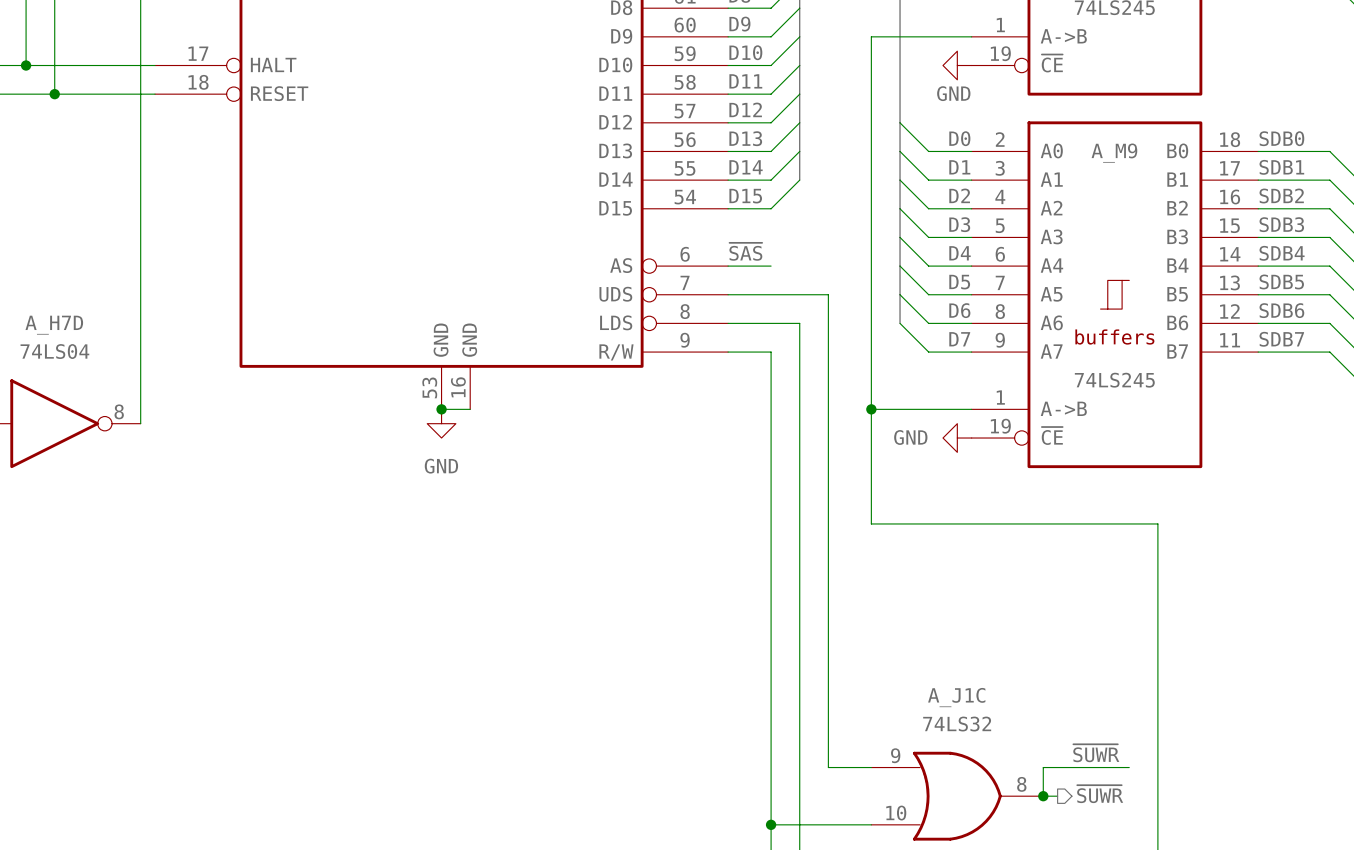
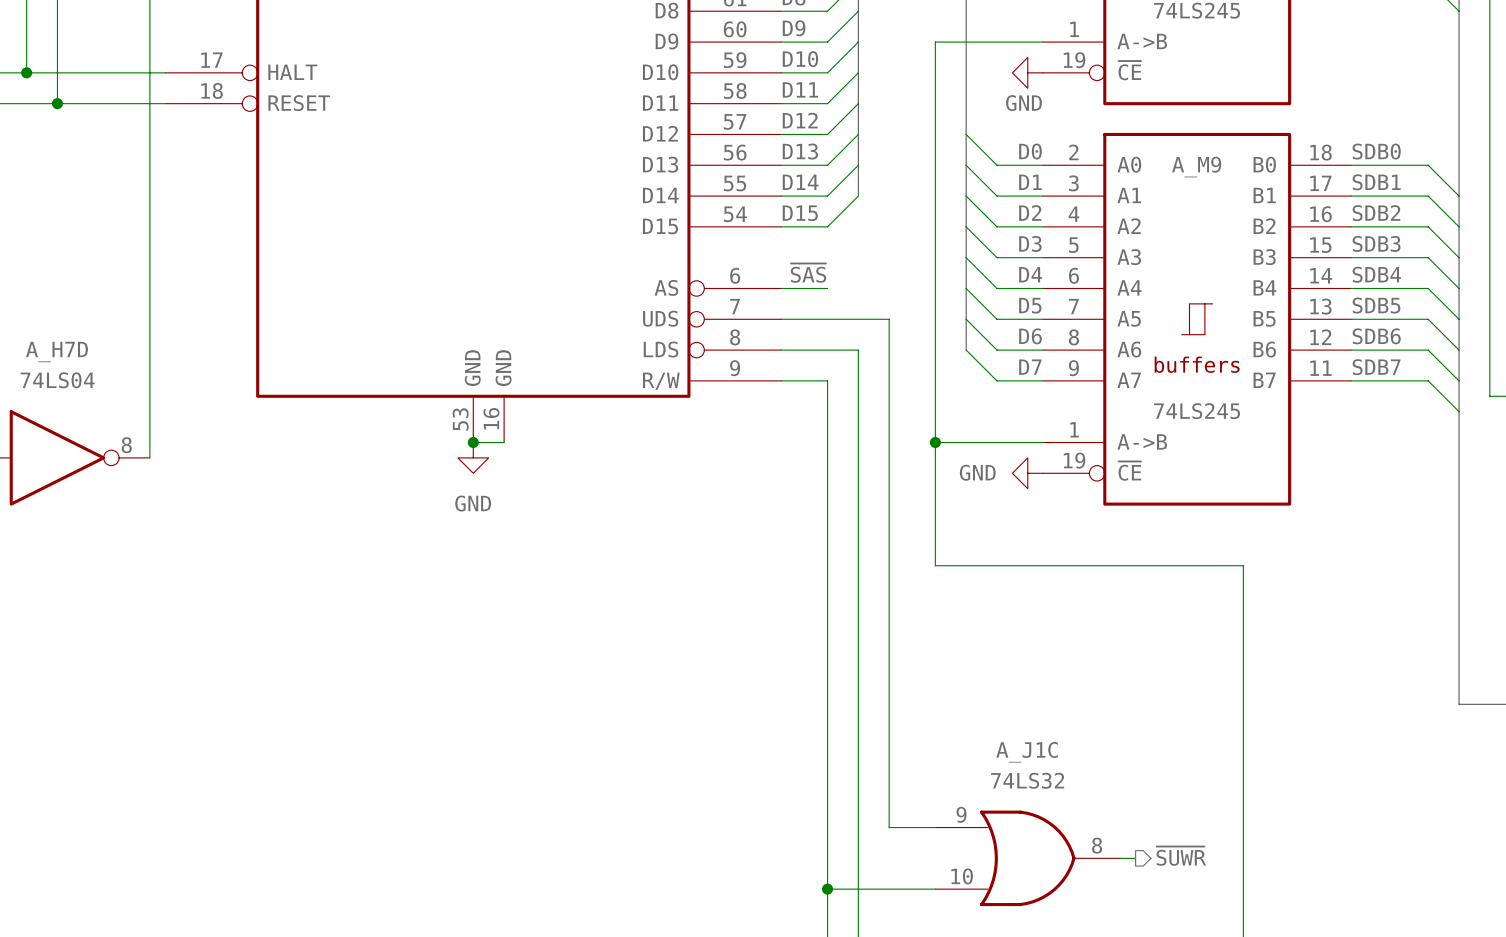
label position: ~{SAS} (745, 251) -> ~{SAS} (808, 273)
label: ~{SUWR} (1096, 753) -> none
wire: (1129, 767) (1043, 767) (1043, 796) -> none
junction: (1043, 796) -> none

